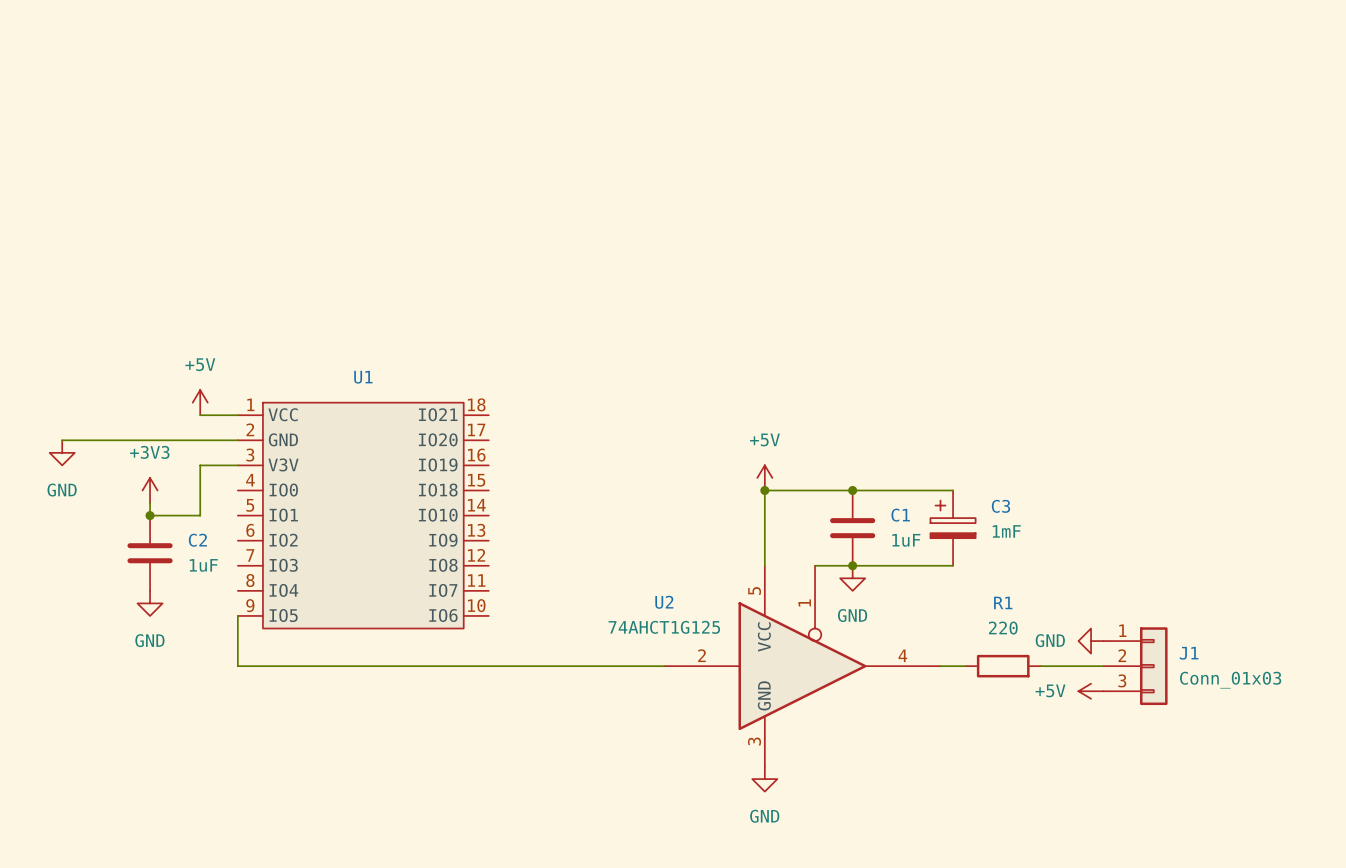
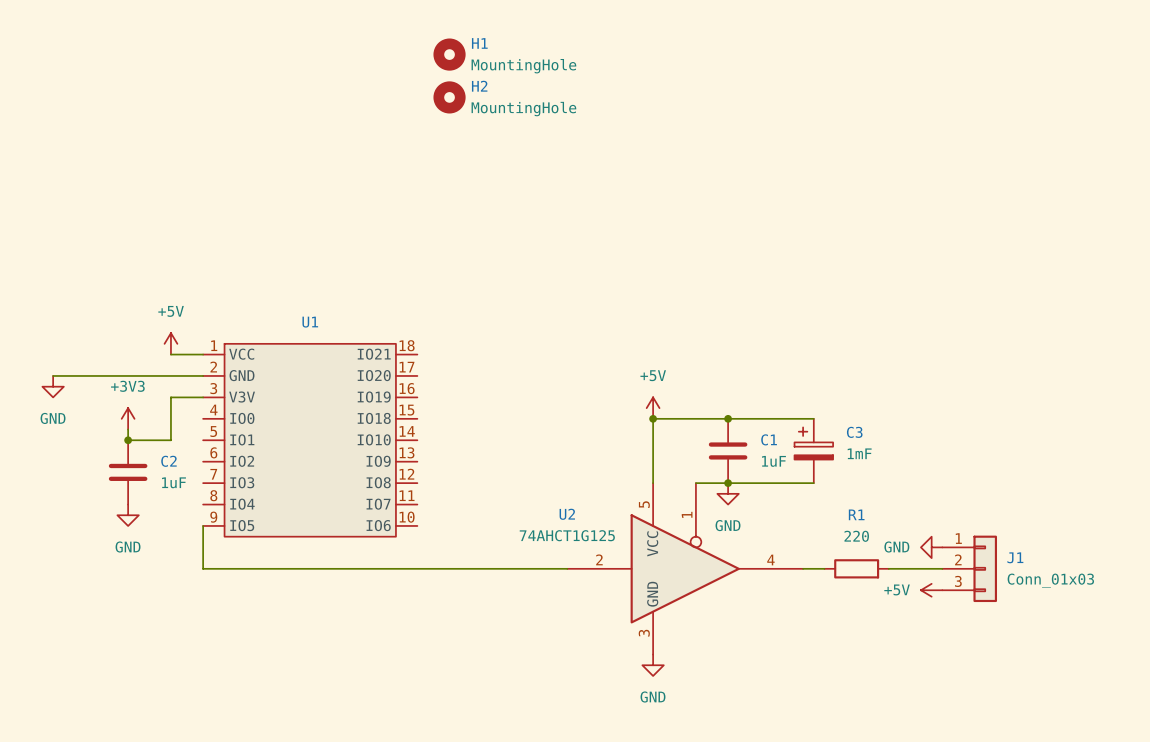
H1: none -> MountingHole (449, 54)
H2: none -> MountingHole (449, 97)

